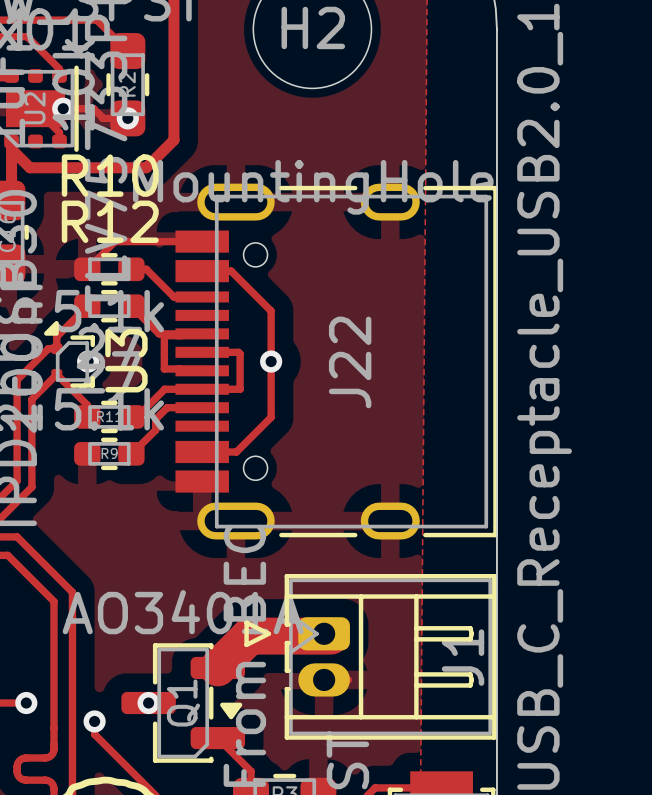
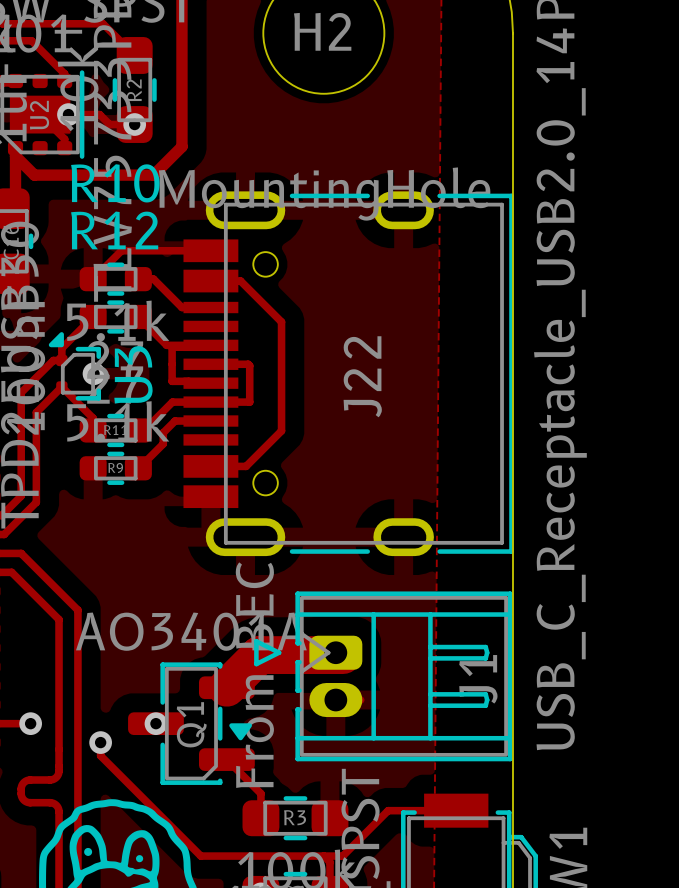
via: (271, 361) -> none

